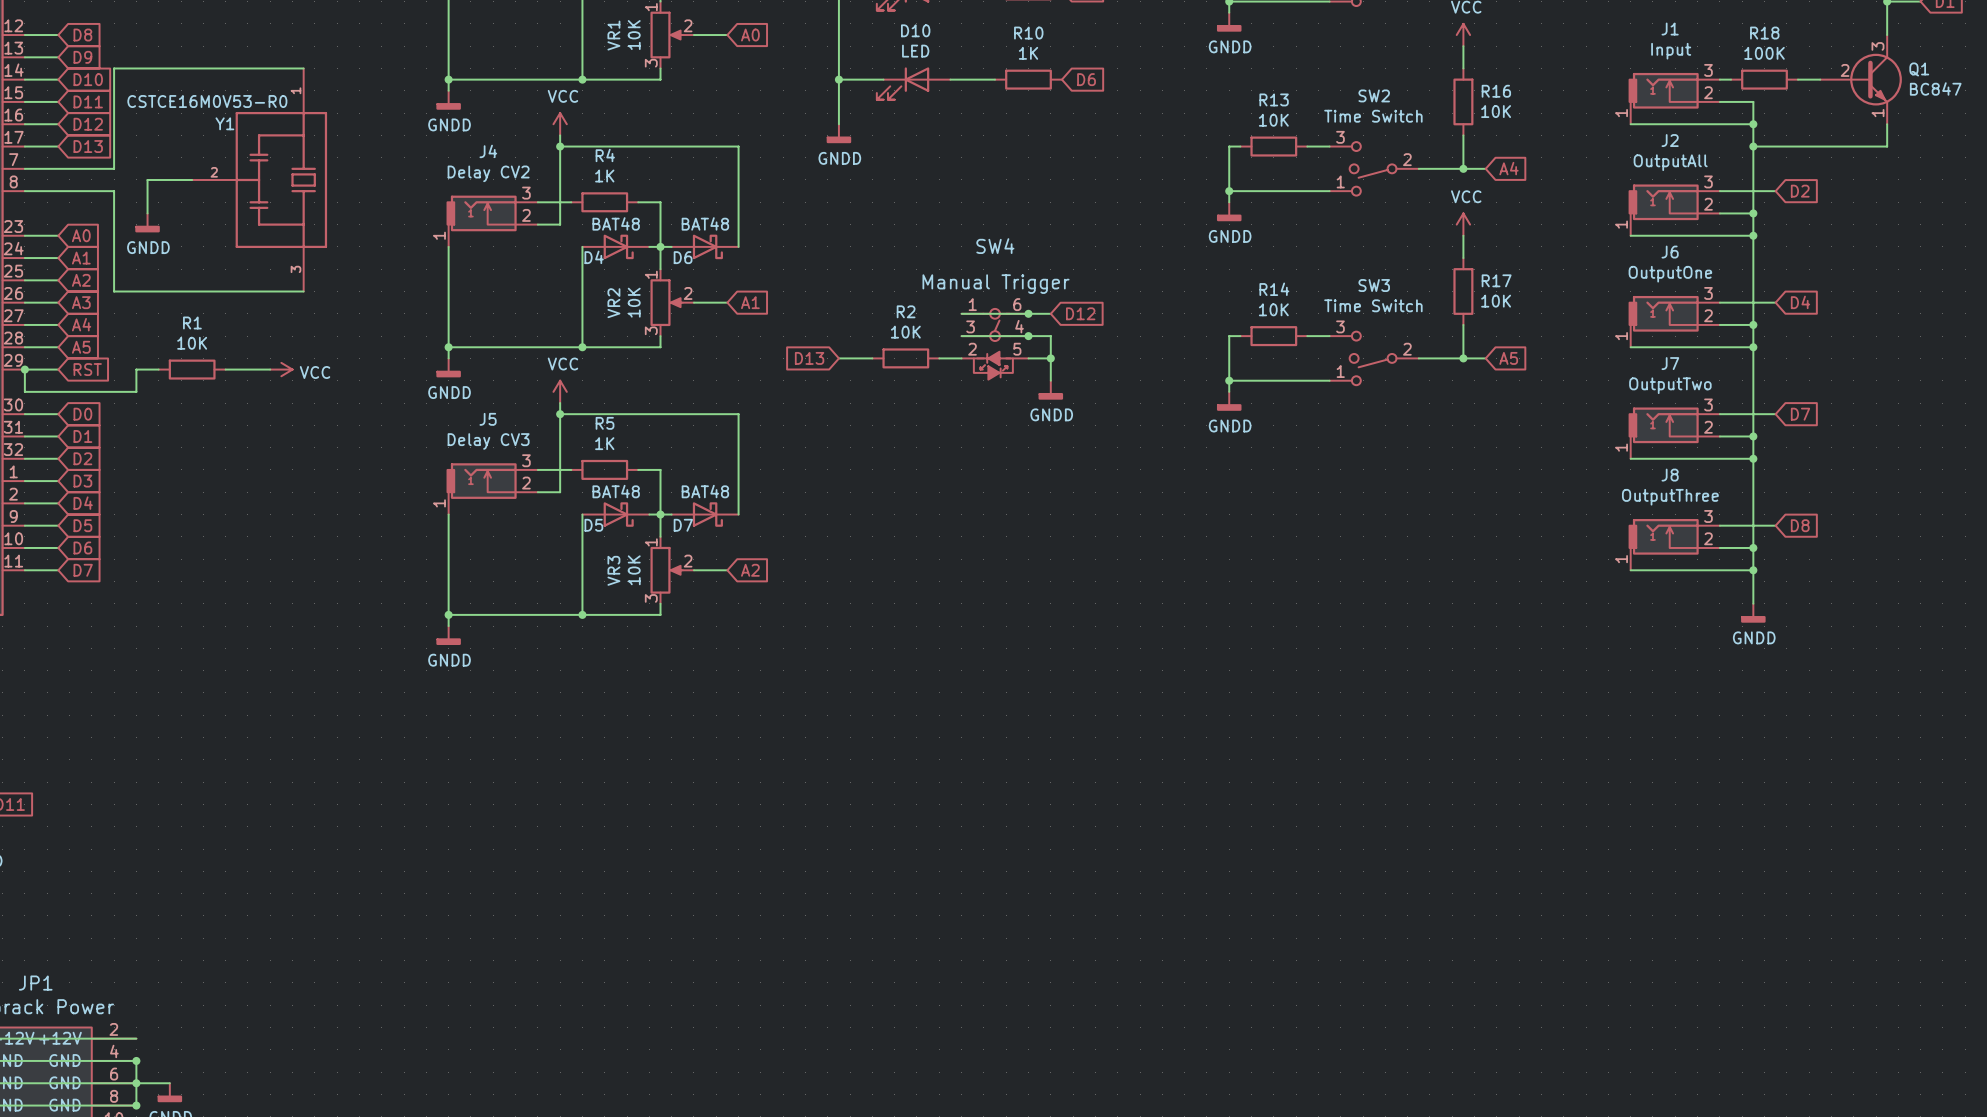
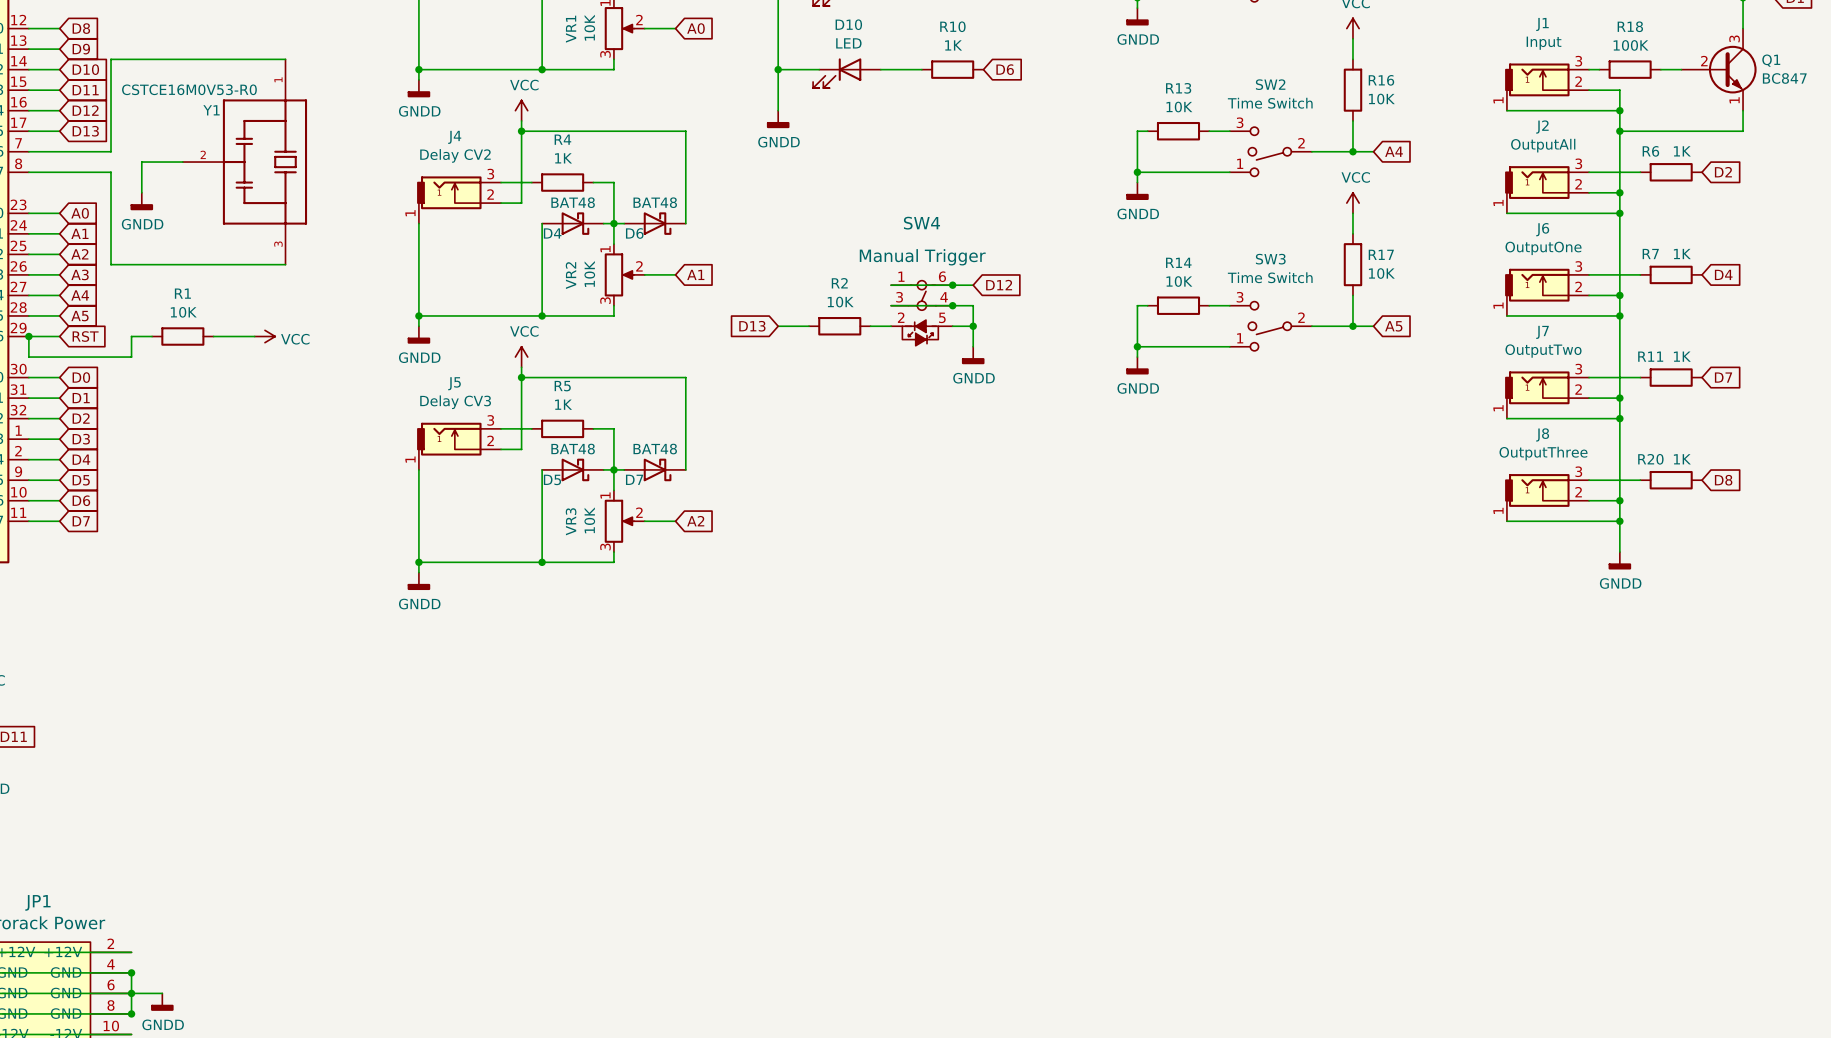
global label position: D2 (1800, 191) -> D2 (1723, 172)
R6: none -> 1K (1671, 172)
global label position: D4 (1800, 302) -> D4 (1723, 274)
R7: none -> 1K (1671, 274)
global label position: D7 (1800, 414) -> D7 (1723, 377)
R11: none -> 1K (1671, 377)
global label position: D8 (1800, 525) -> D8 (1723, 480)
R20: none -> 1K (1671, 480)

